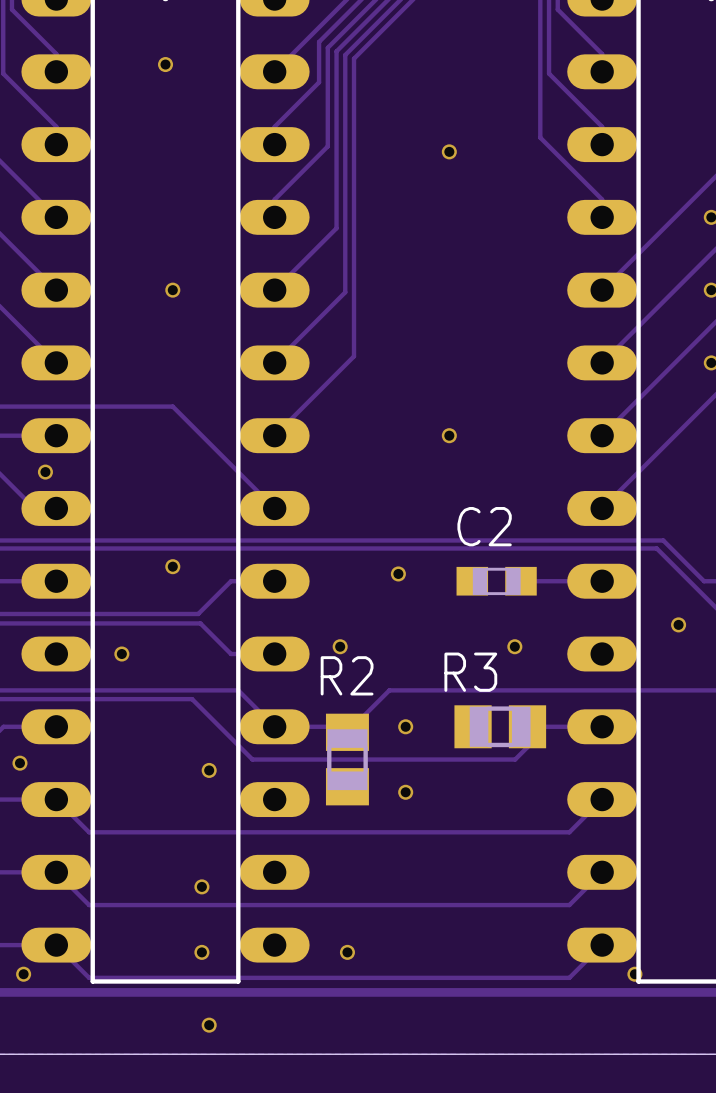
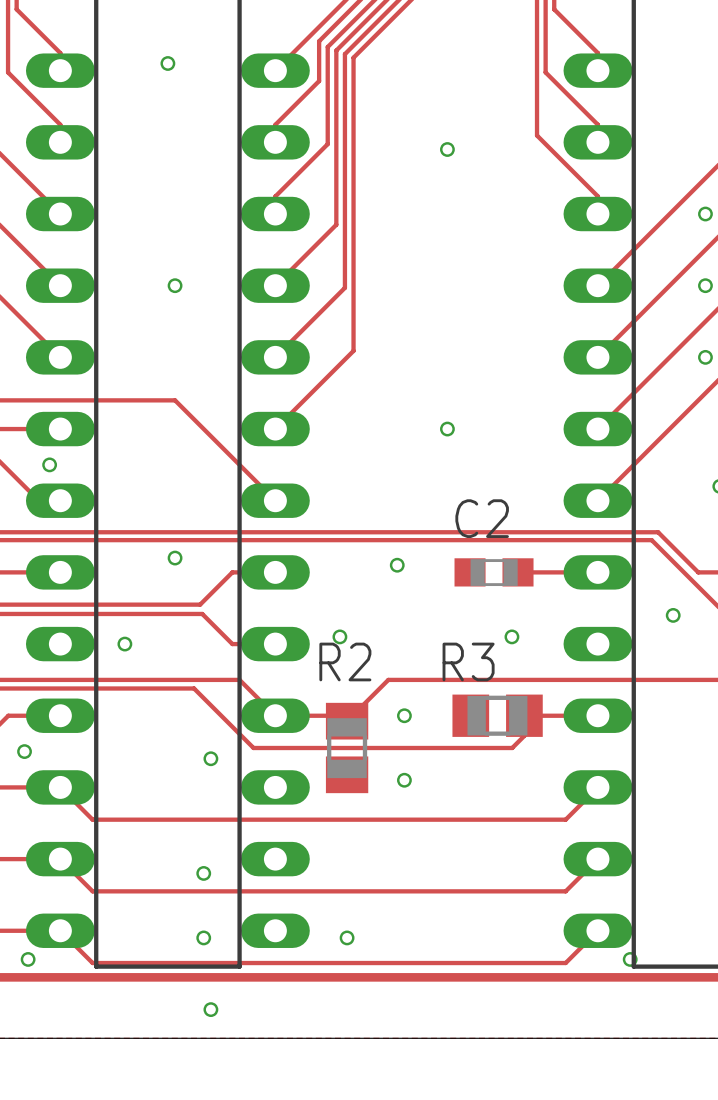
R2 name position: R2 (347, 675) -> R2 (345, 661)

